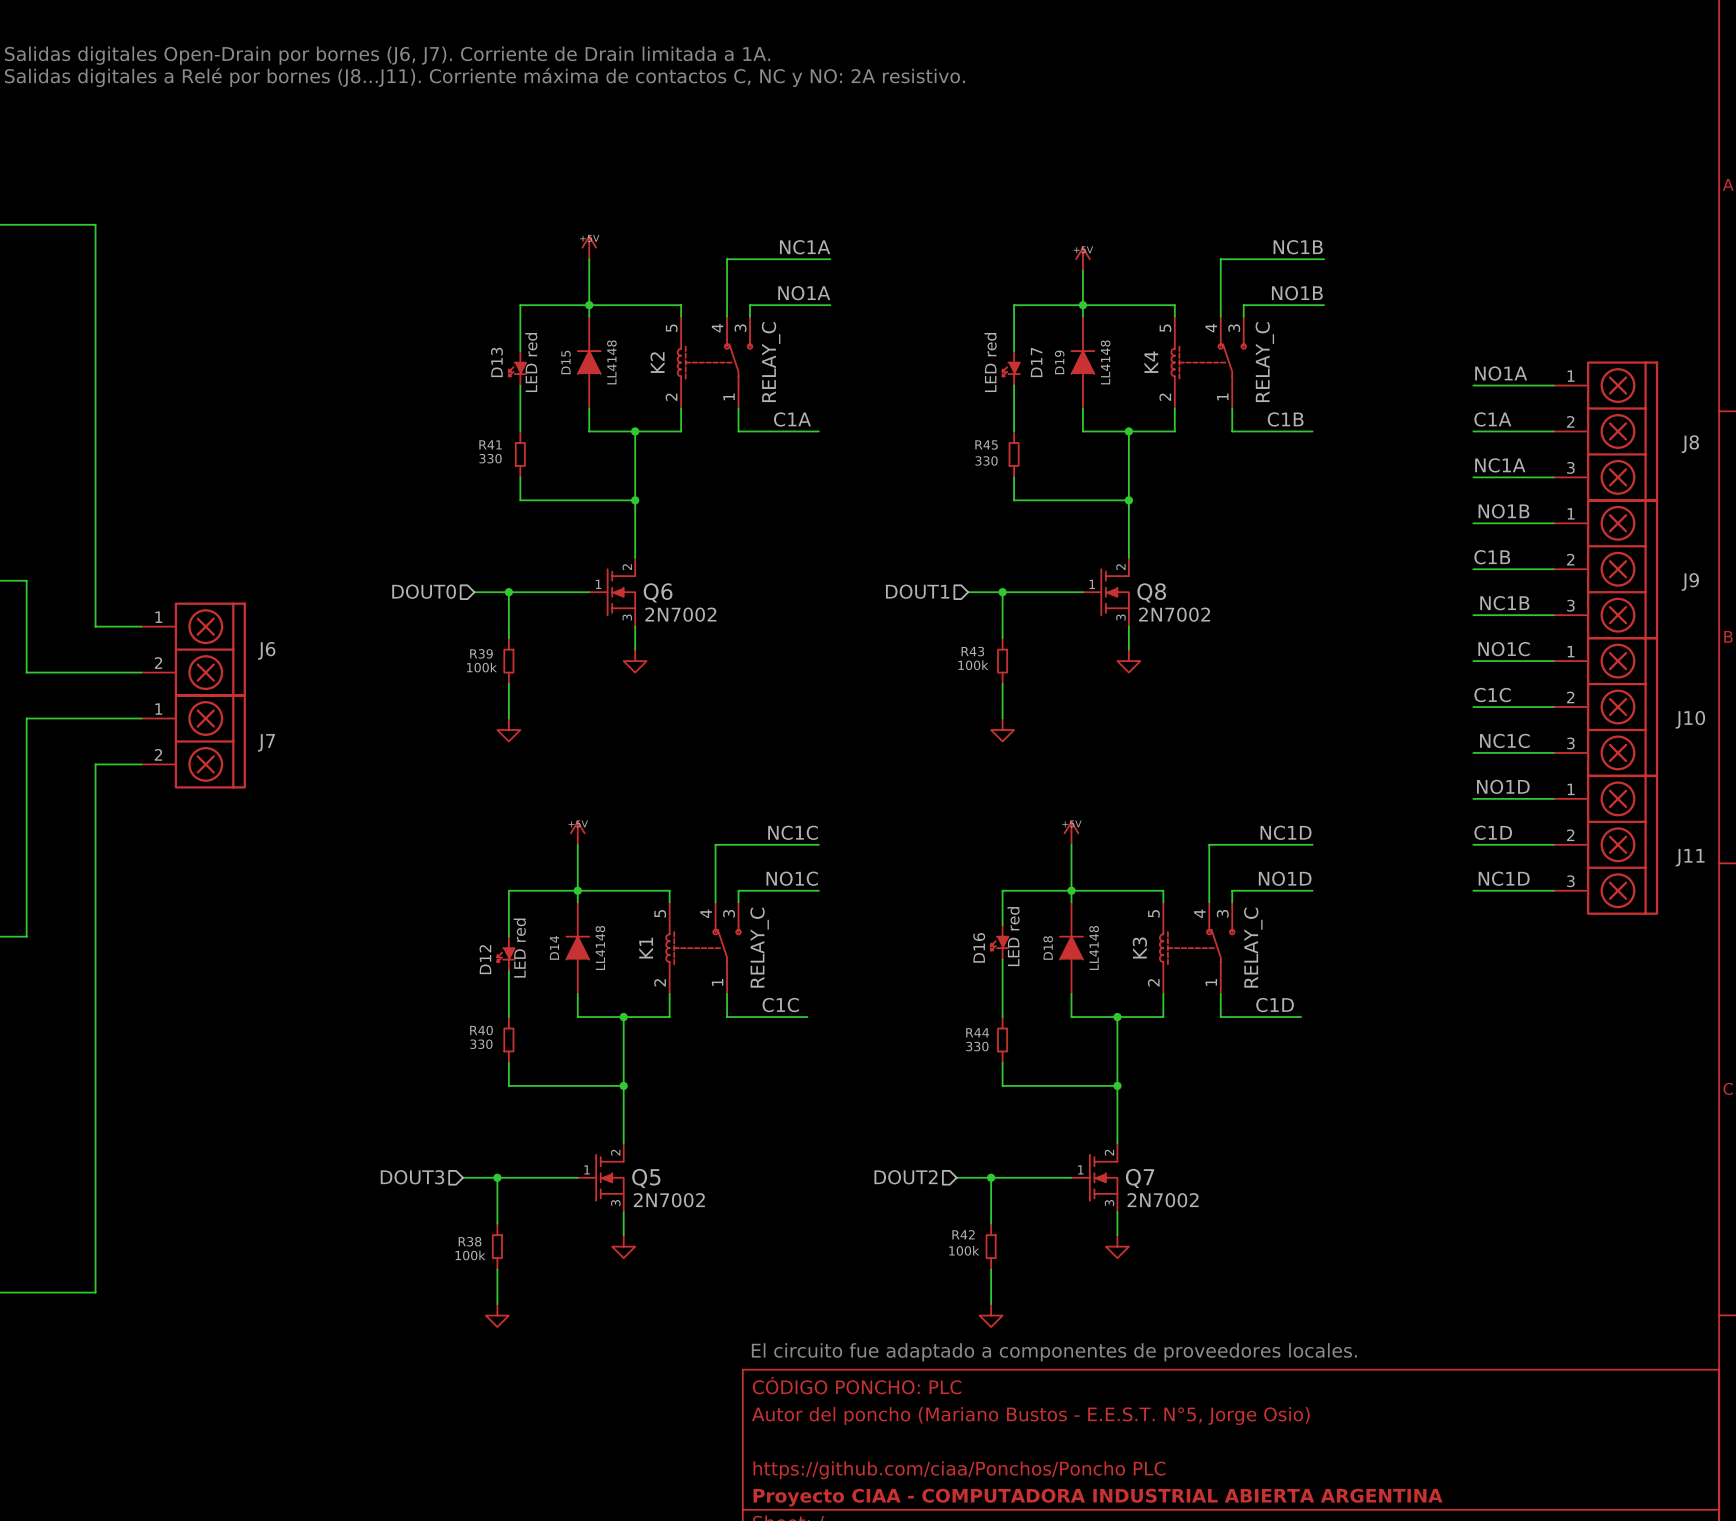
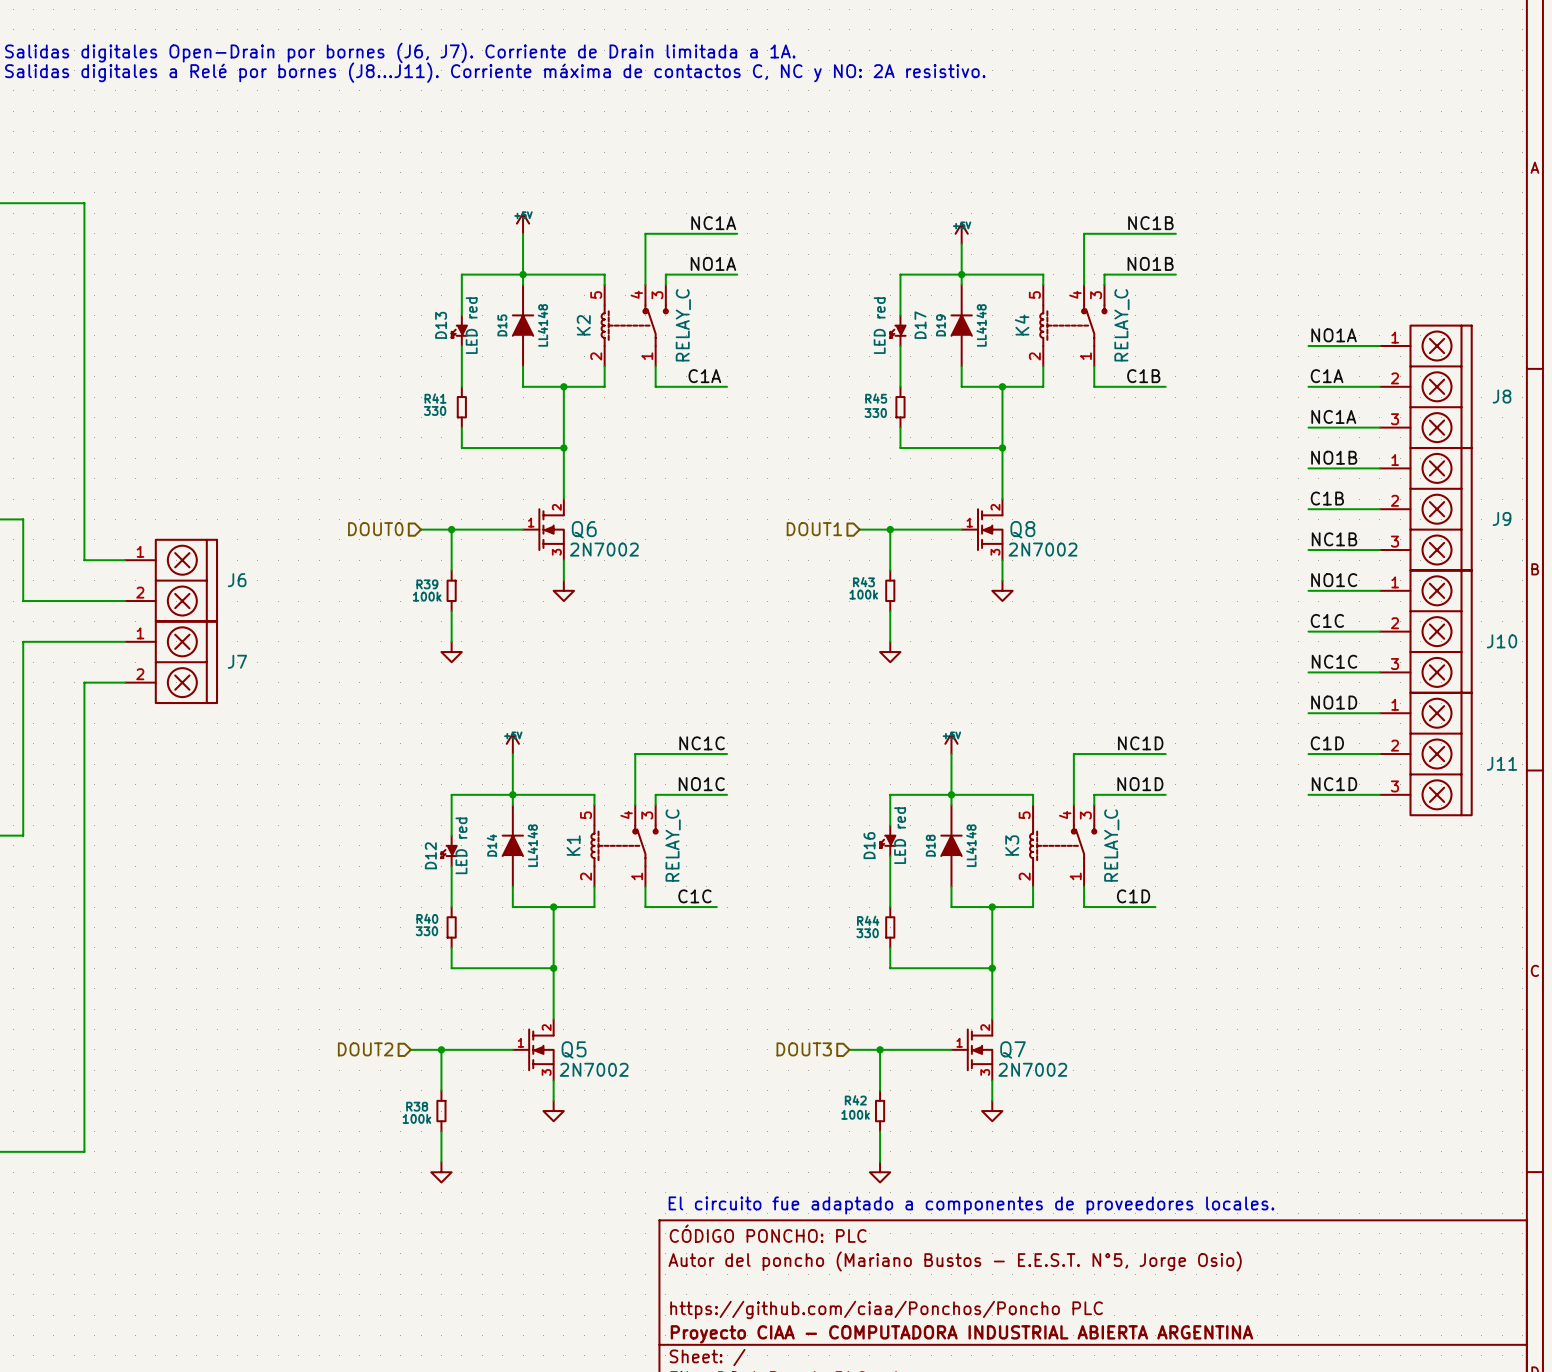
hierarchical label: DOUT3 (412, 1177) -> DOUT2 (365, 1049)
hierarchical label: DOUT2 (906, 1177) -> DOUT3 (804, 1049)

